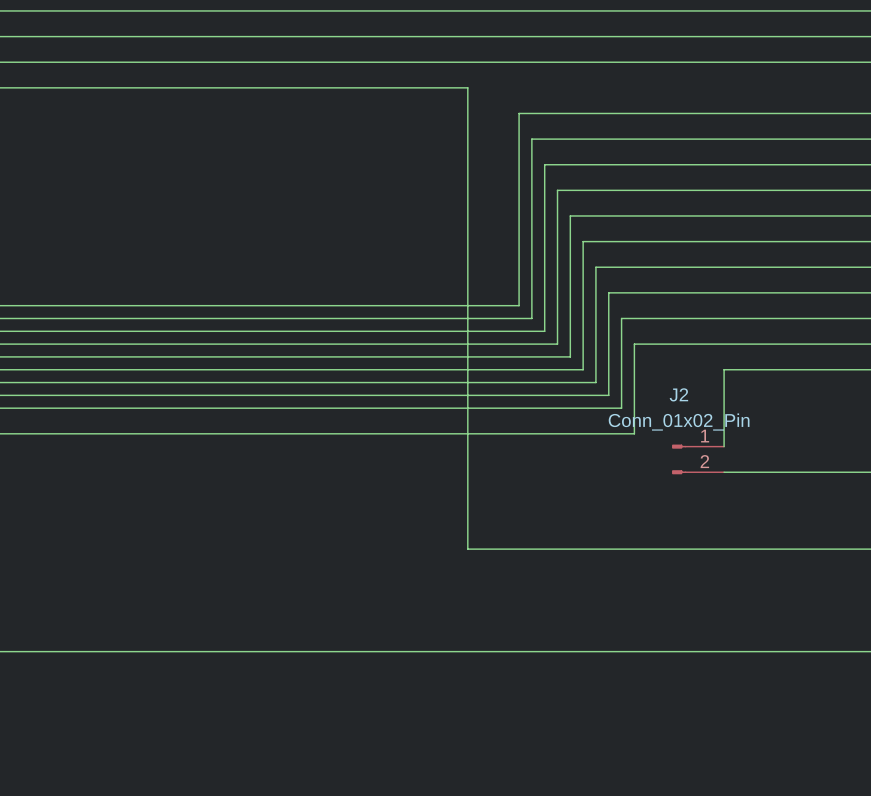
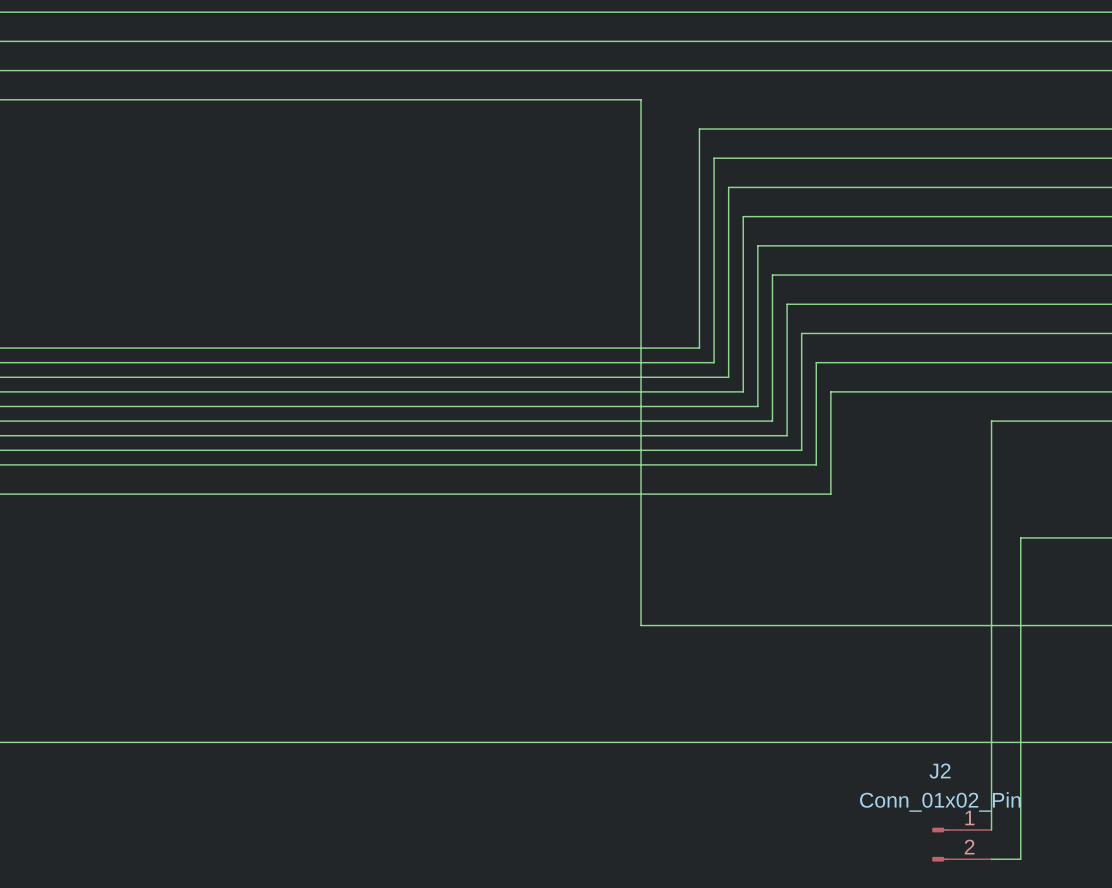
wire: (775, 369) (724, 369) (724, 446) -> (991, 421) (991, 830)
J2 position: (698, 459) -> (961, 844)
wire: (724, 472) (800, 472) -> (991, 859) (1020, 859) (1020, 537)

